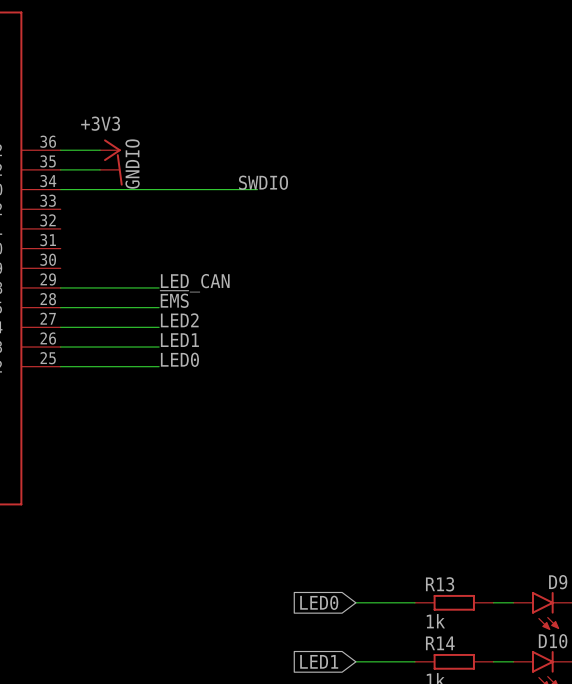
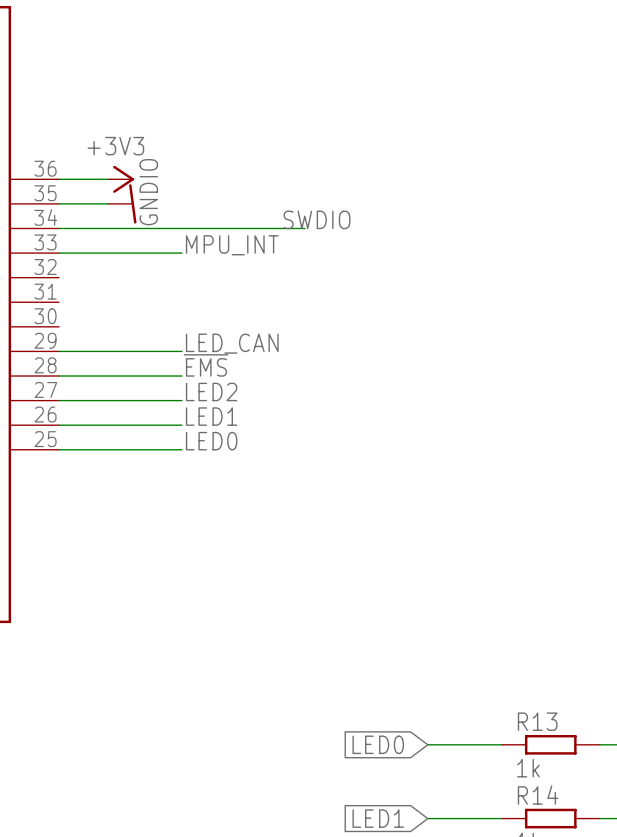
label: none -> MPU_INT (232, 245)
wire: none -> (59, 253) (181, 253)

